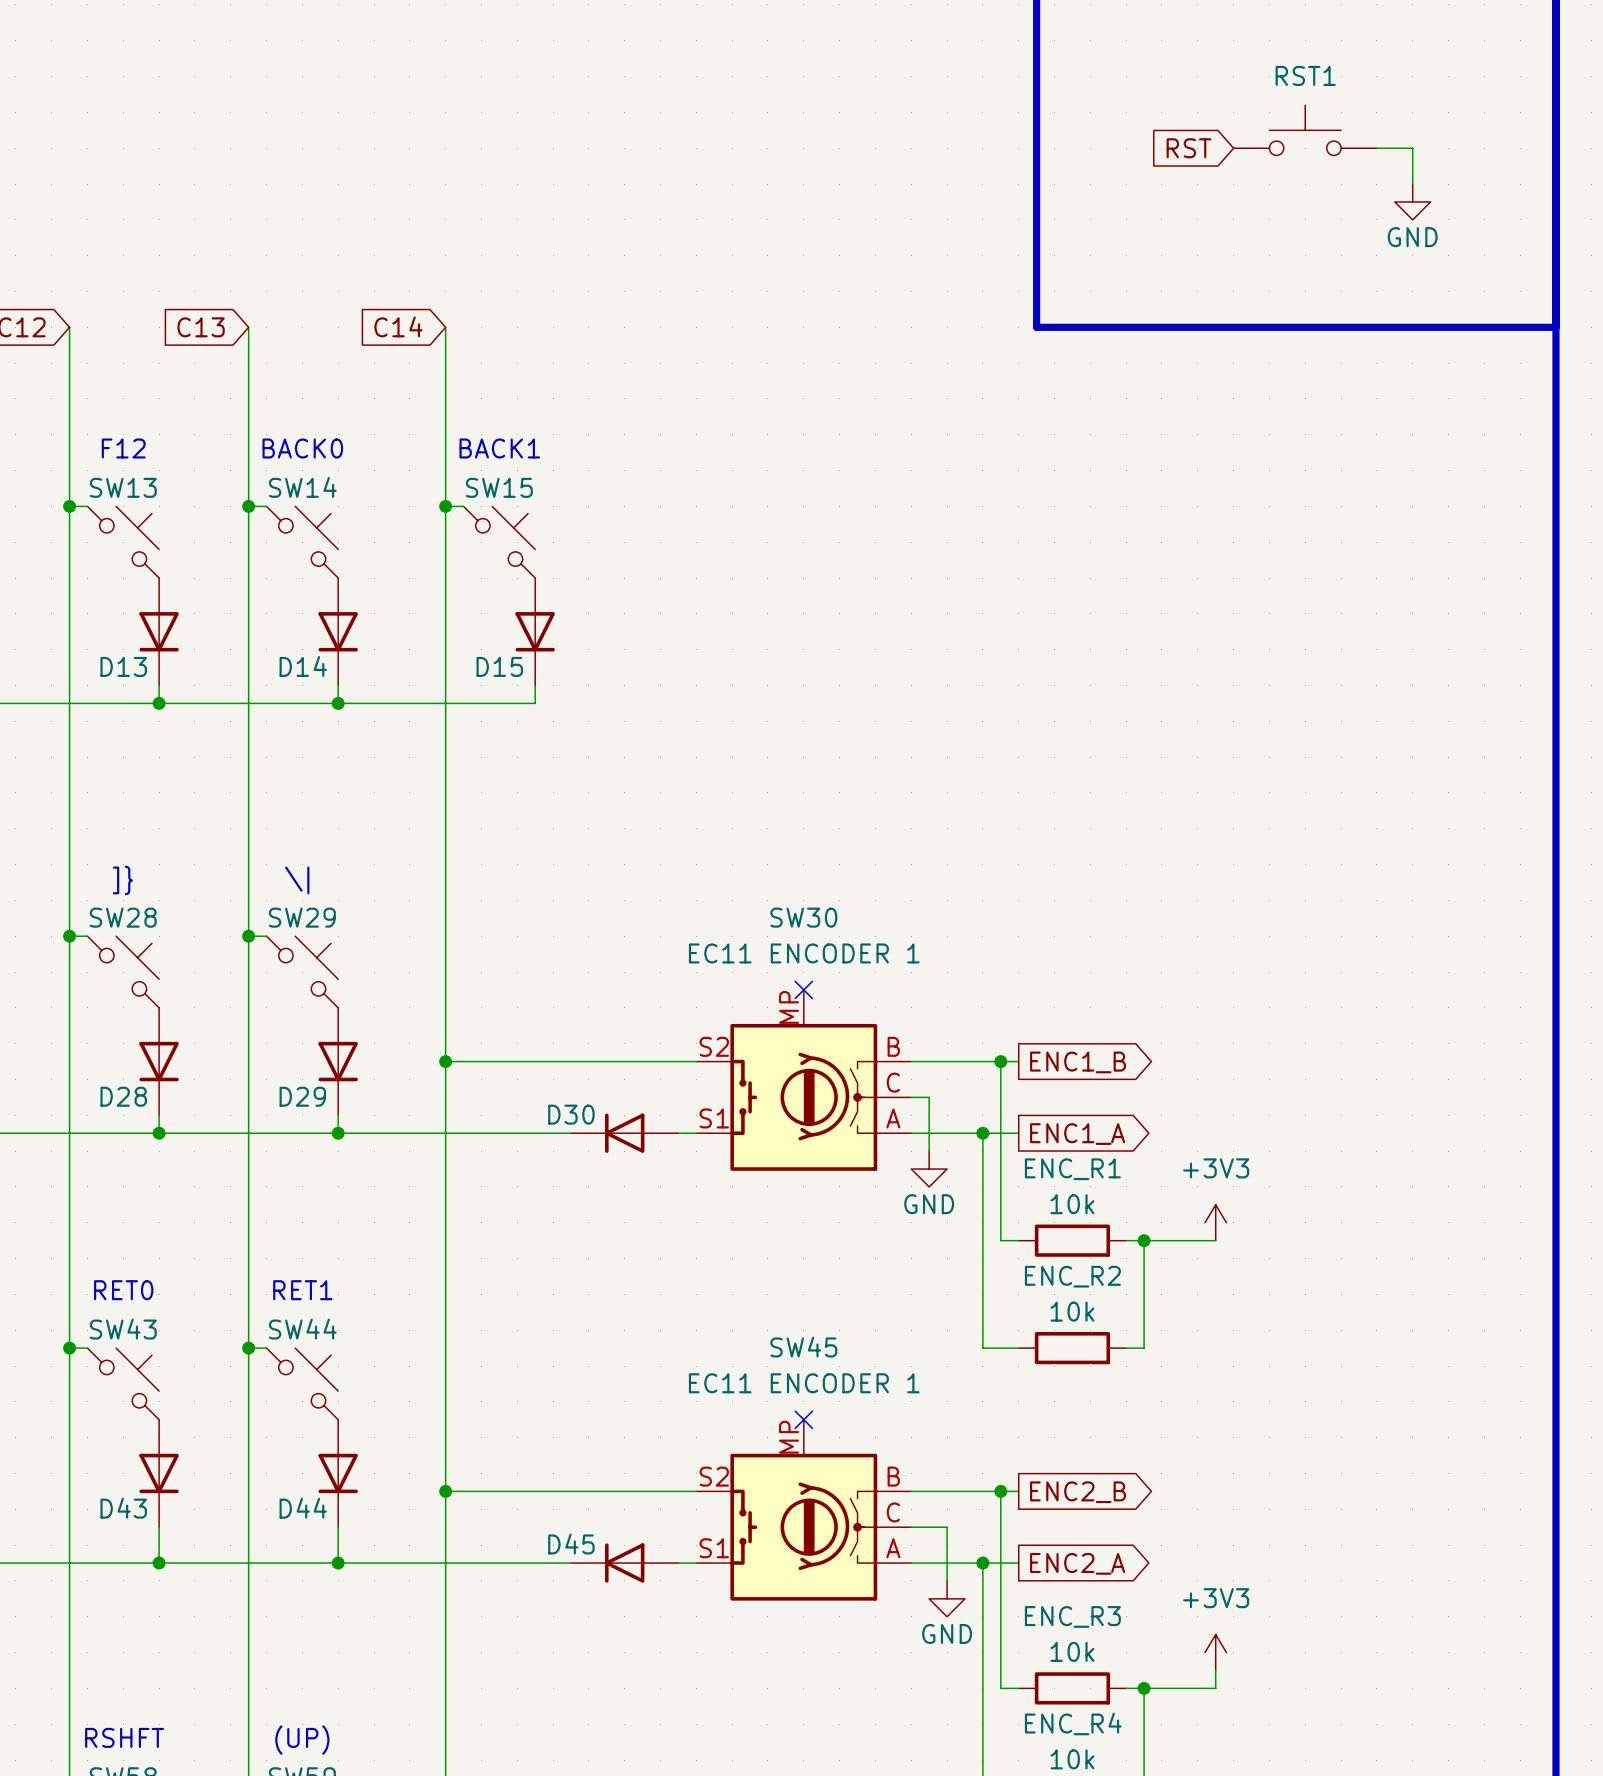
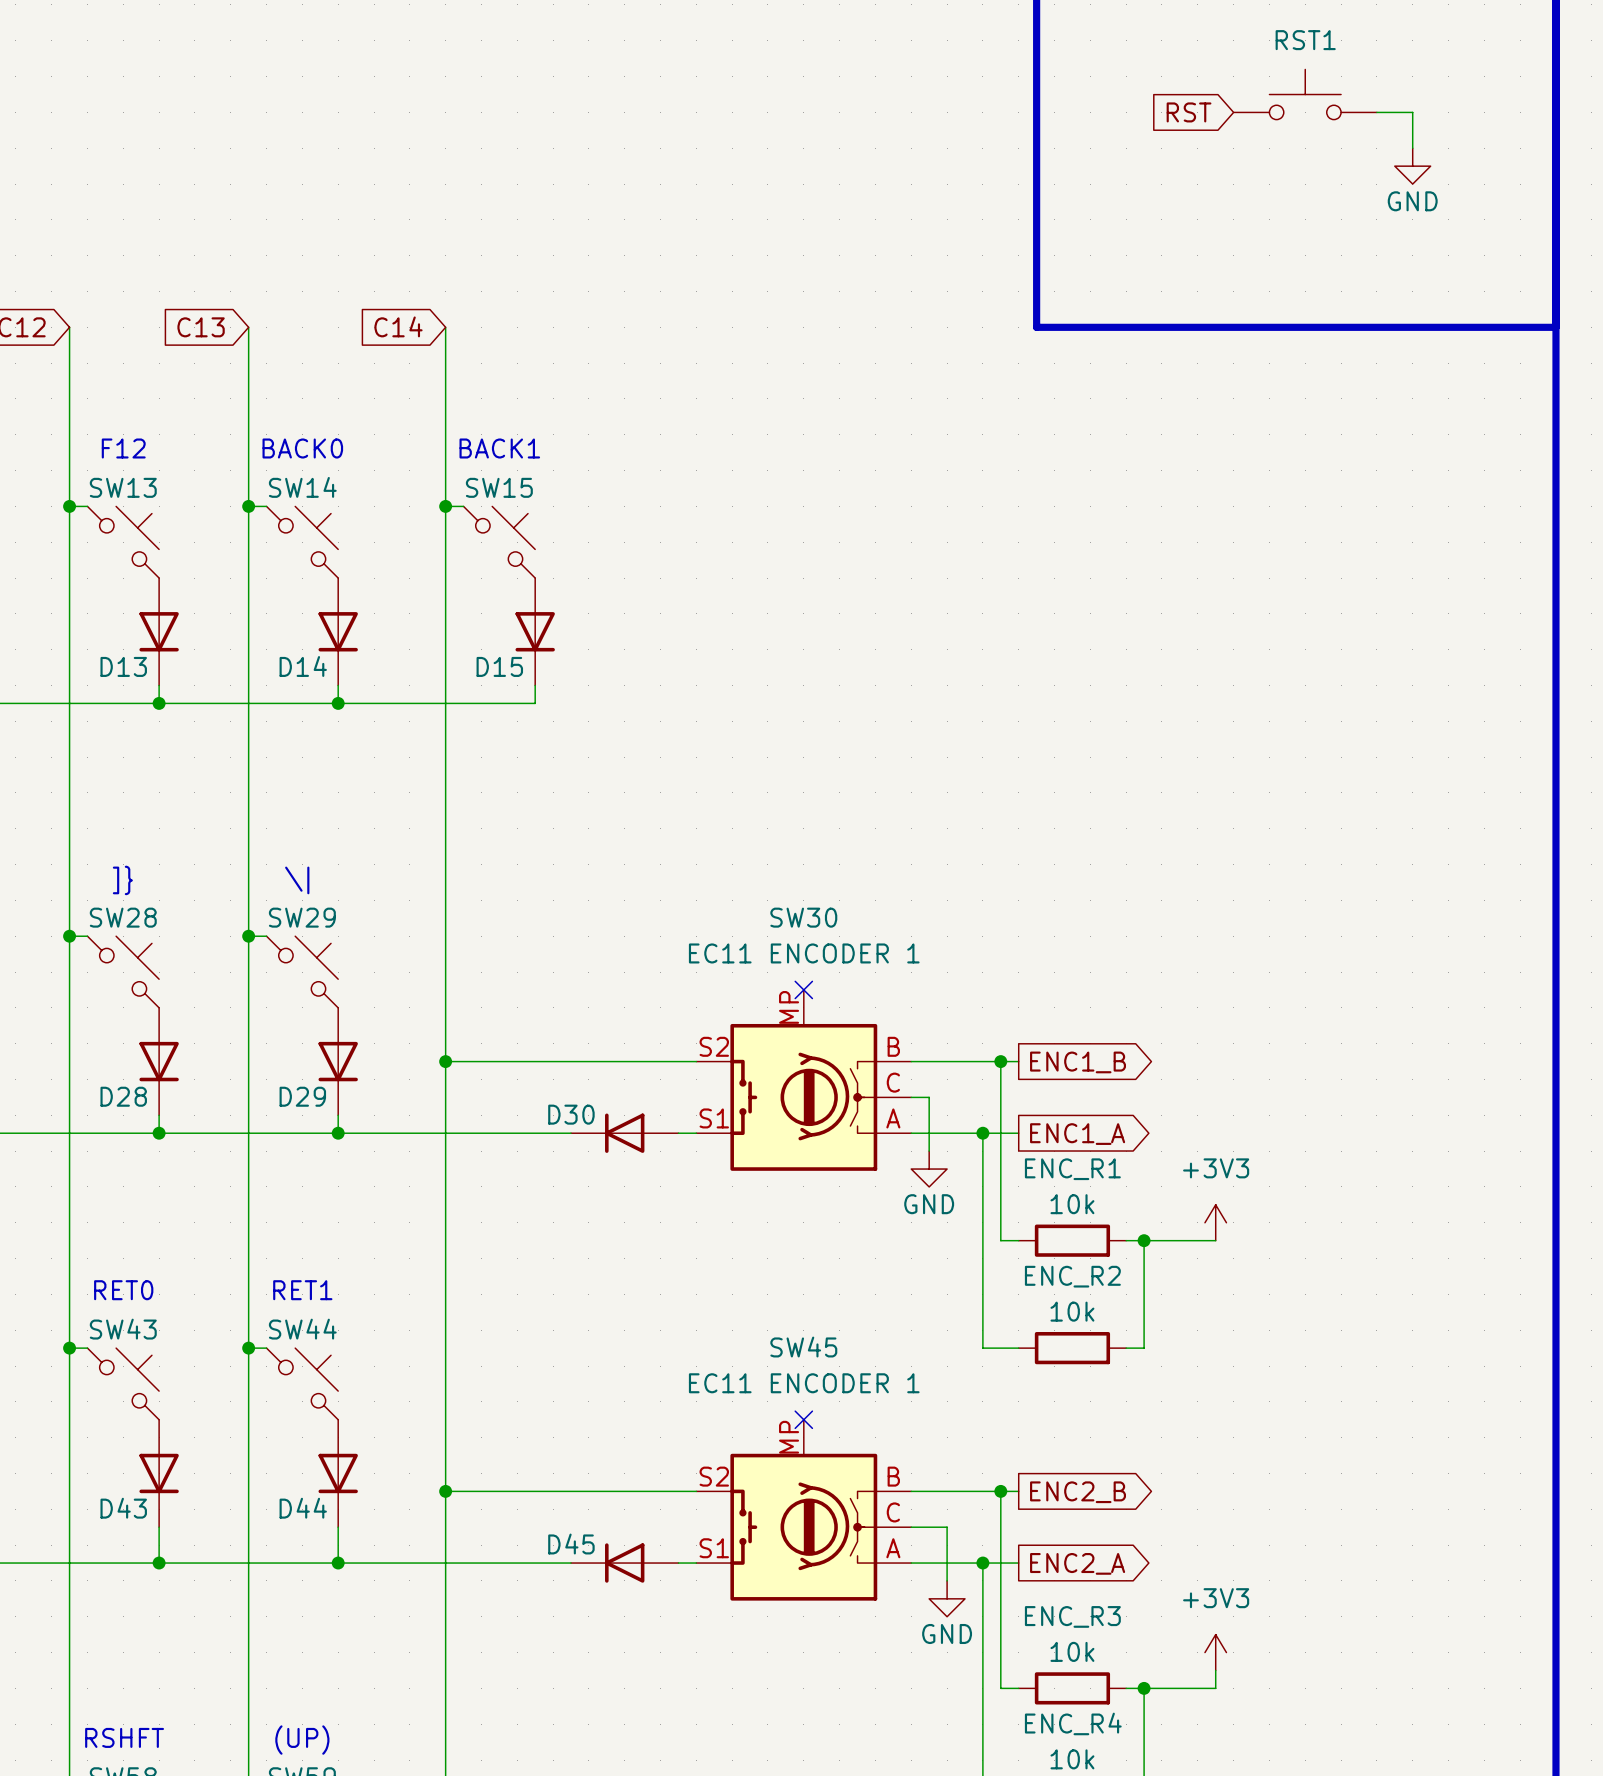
RST1 position: (1305, 130) -> (1305, 94)
global label position: RST (1189, 148) -> RST (1189, 112)
wire: (1376, 148) (1412, 148) (1412, 184) -> (1376, 112) (1412, 112) (1412, 148)
power symbol position: GND (1412, 201) -> GND (1412, 166)

